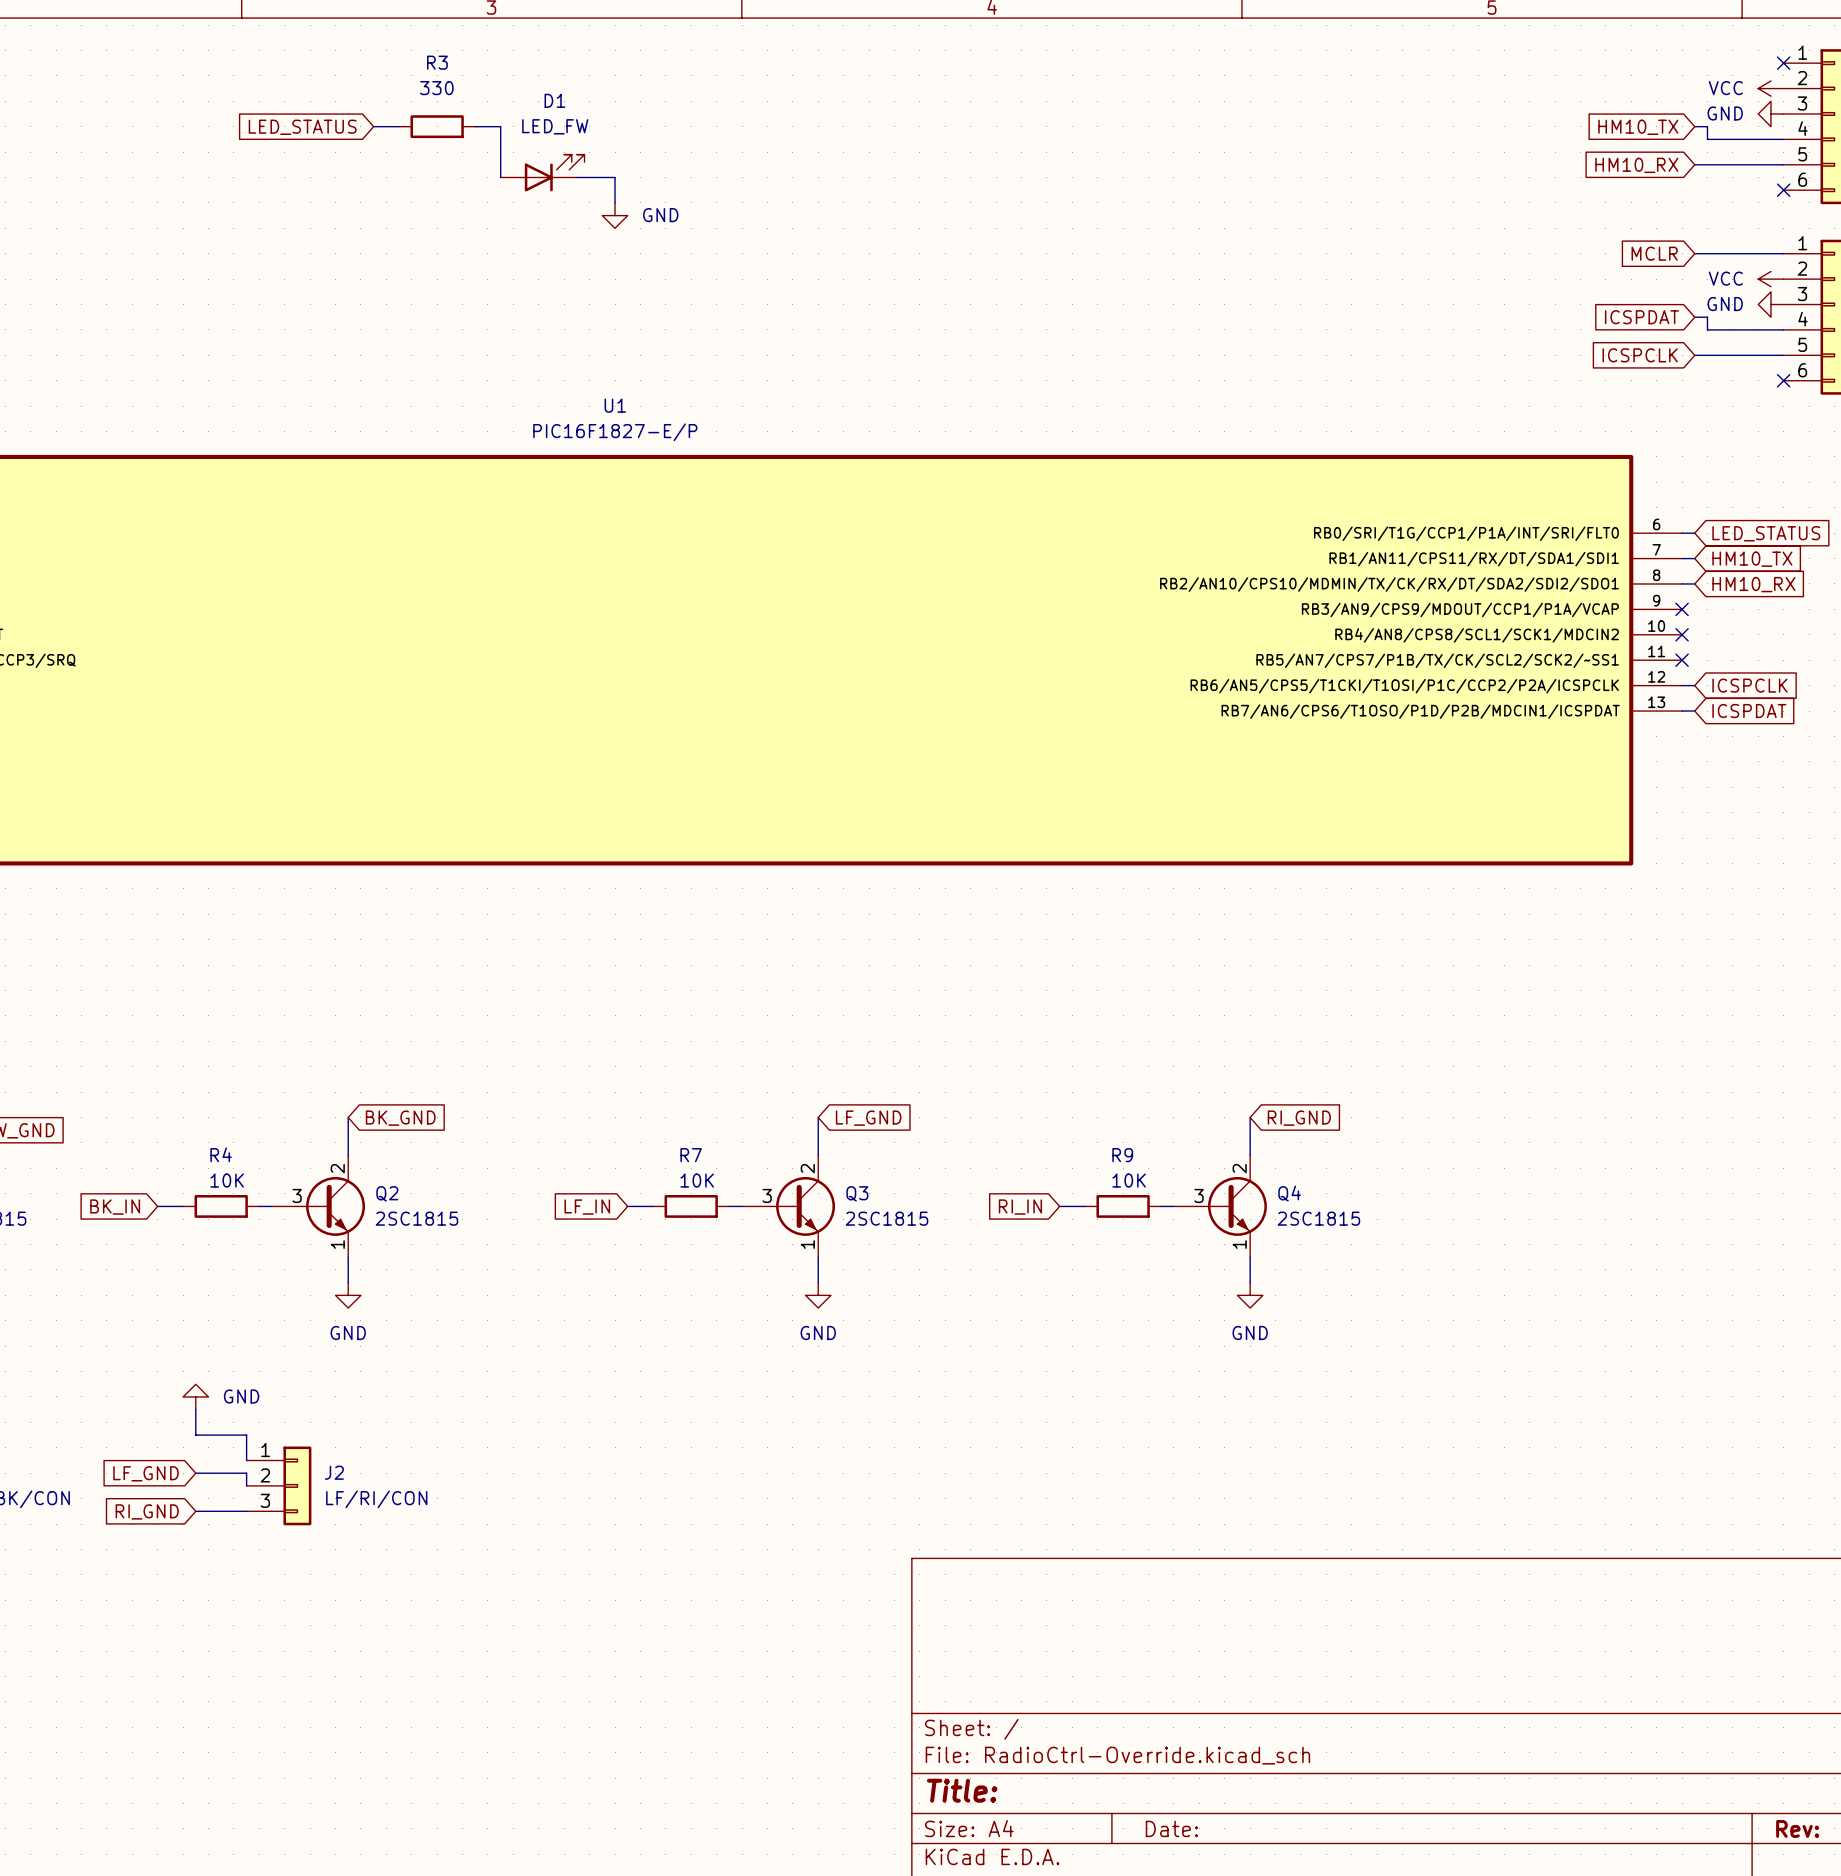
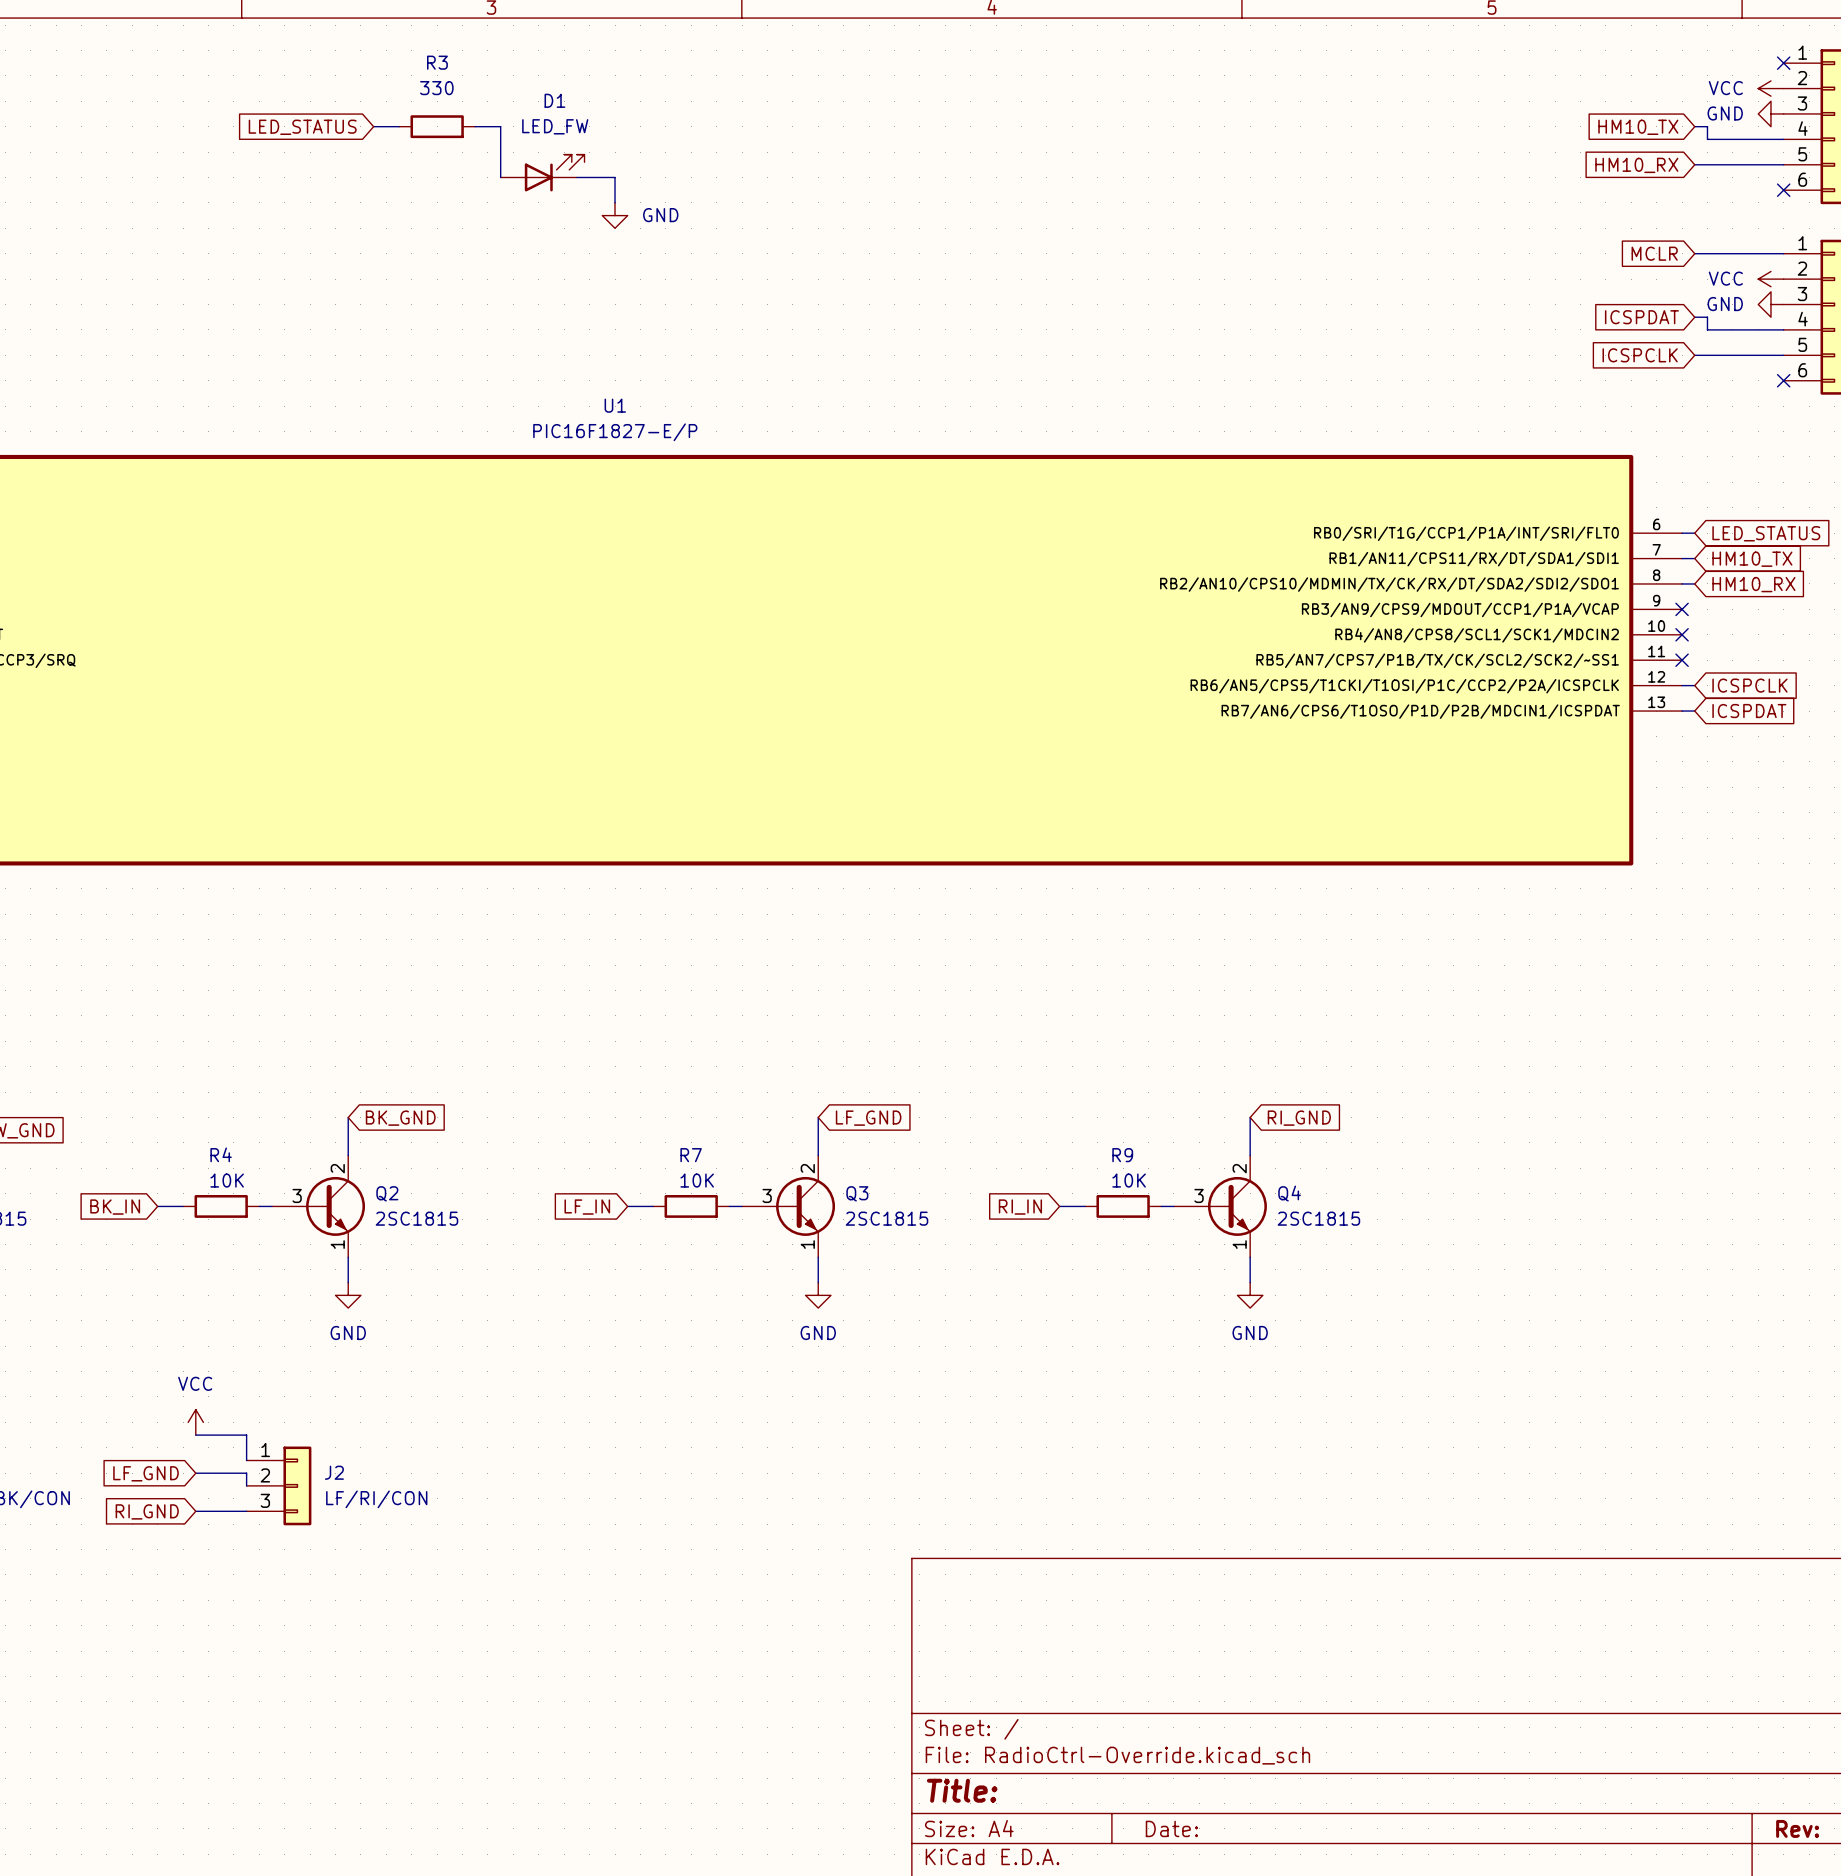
power symbol: GND (195, 1396) -> none
power symbol: none -> VCC (195, 1422)

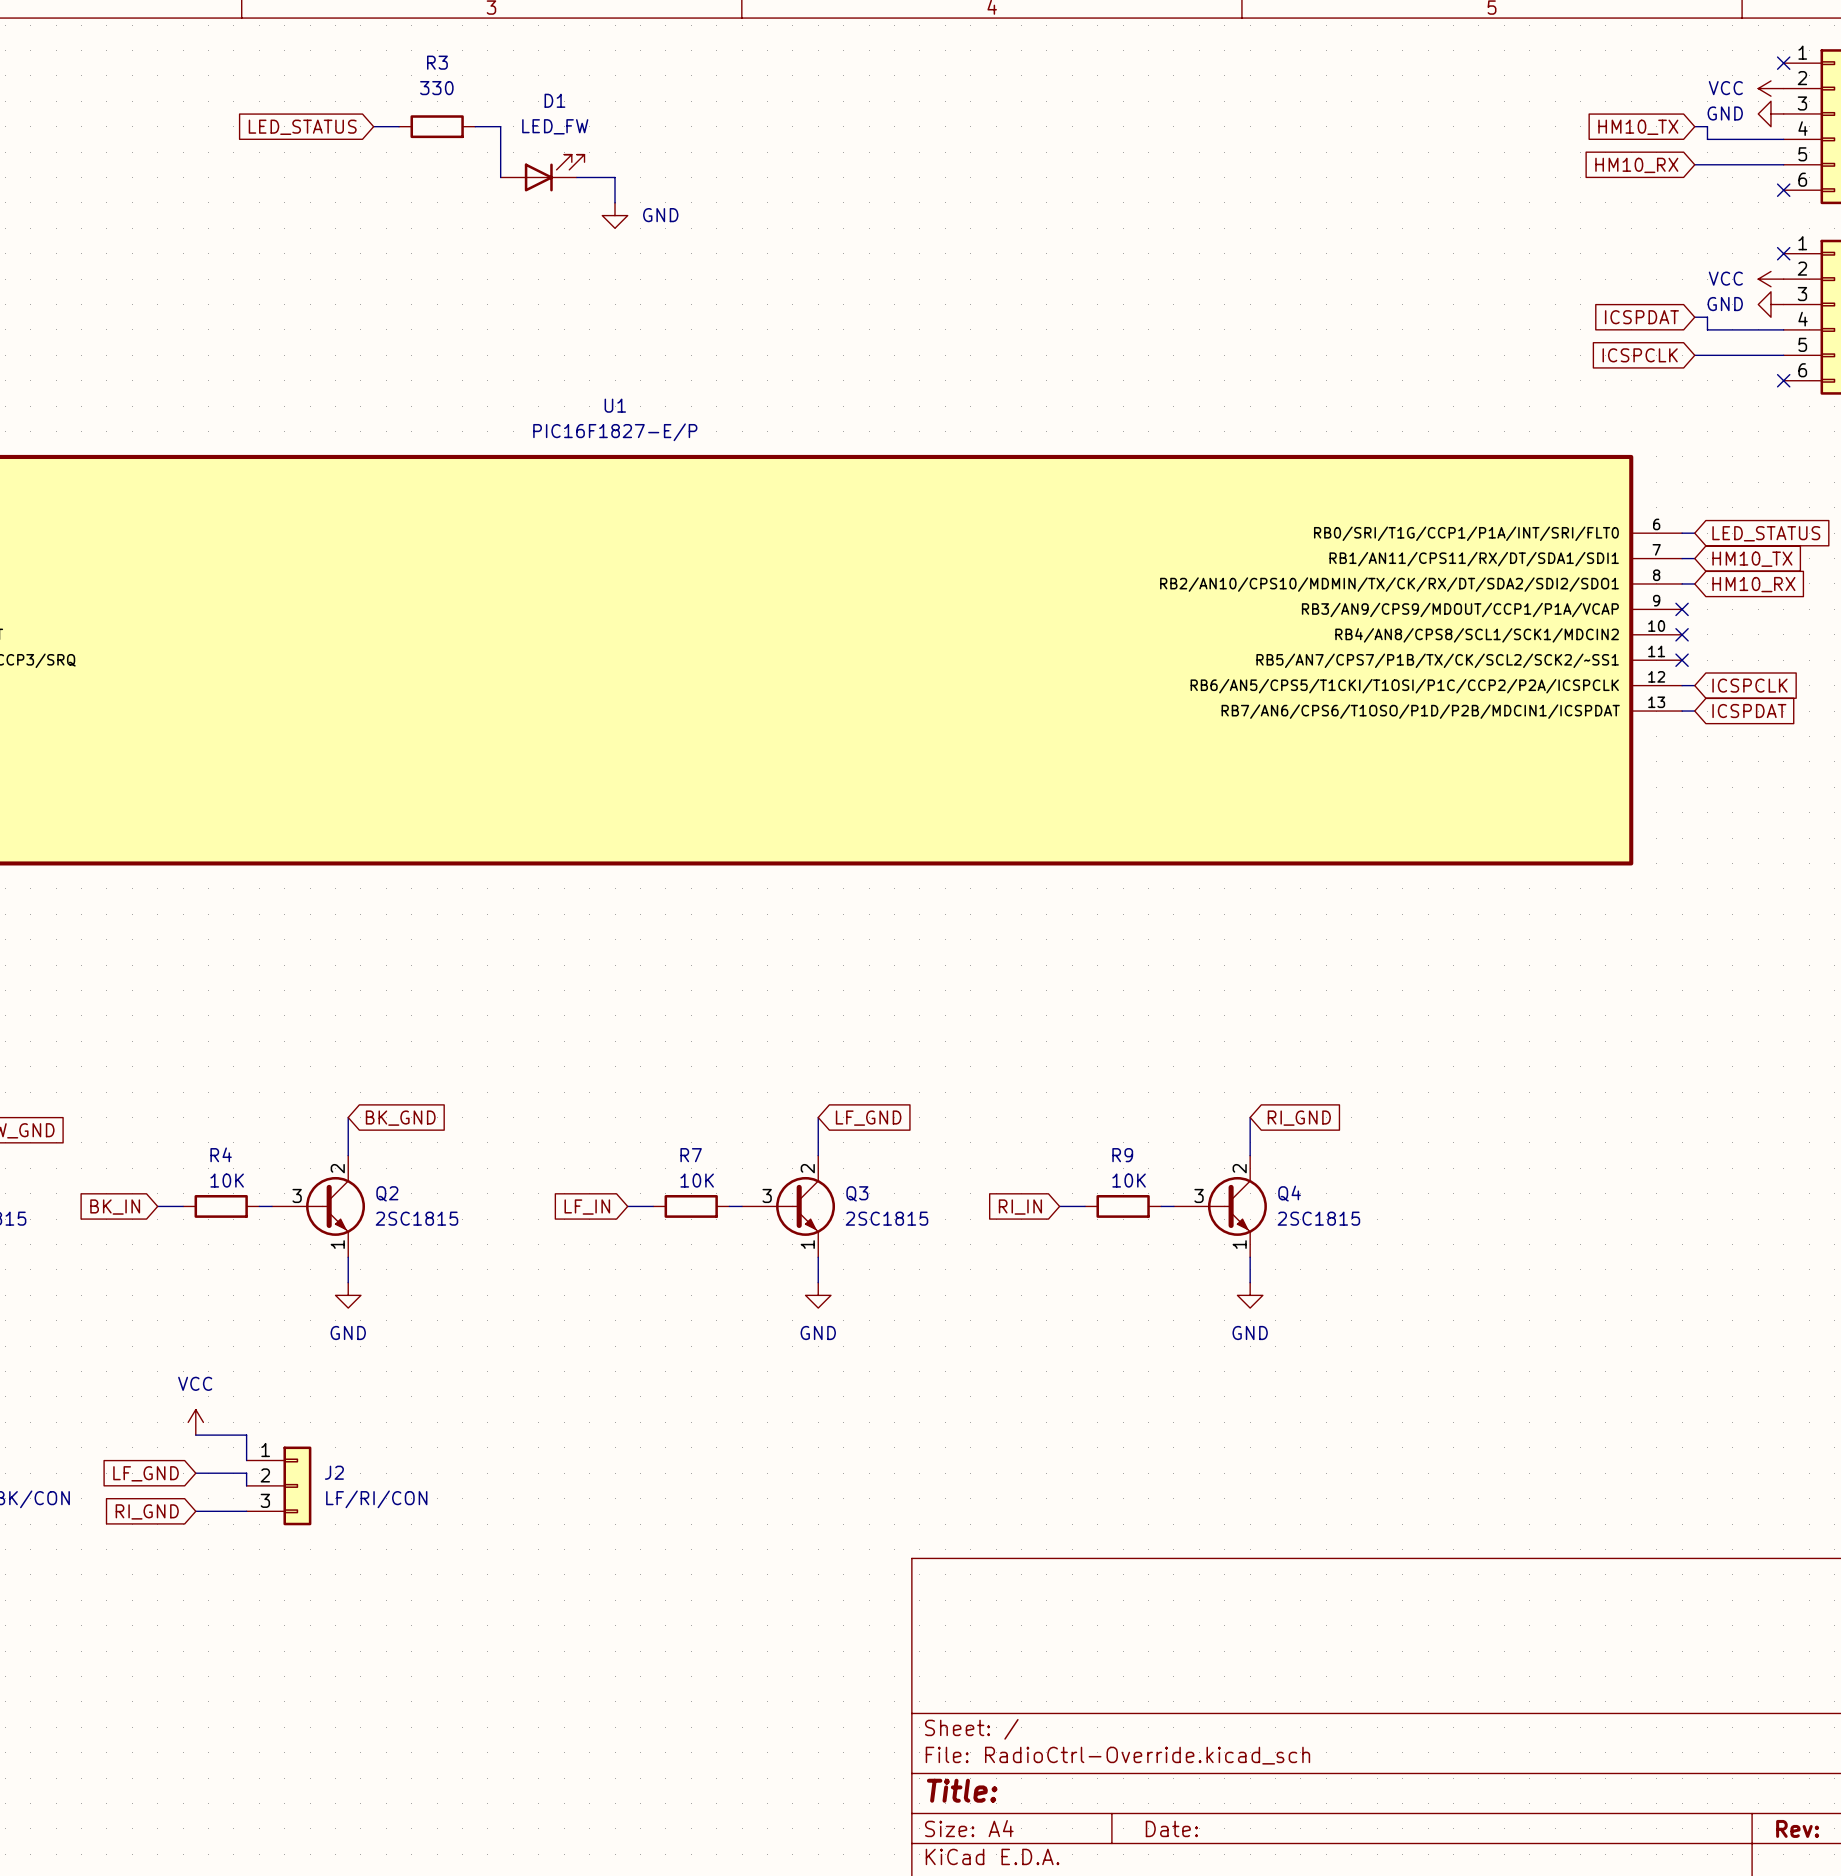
global label: MCLR (1654, 253) -> none
wire: (1694, 253) (1783, 253) -> none
no-connect mark: none -> (1783, 253)

